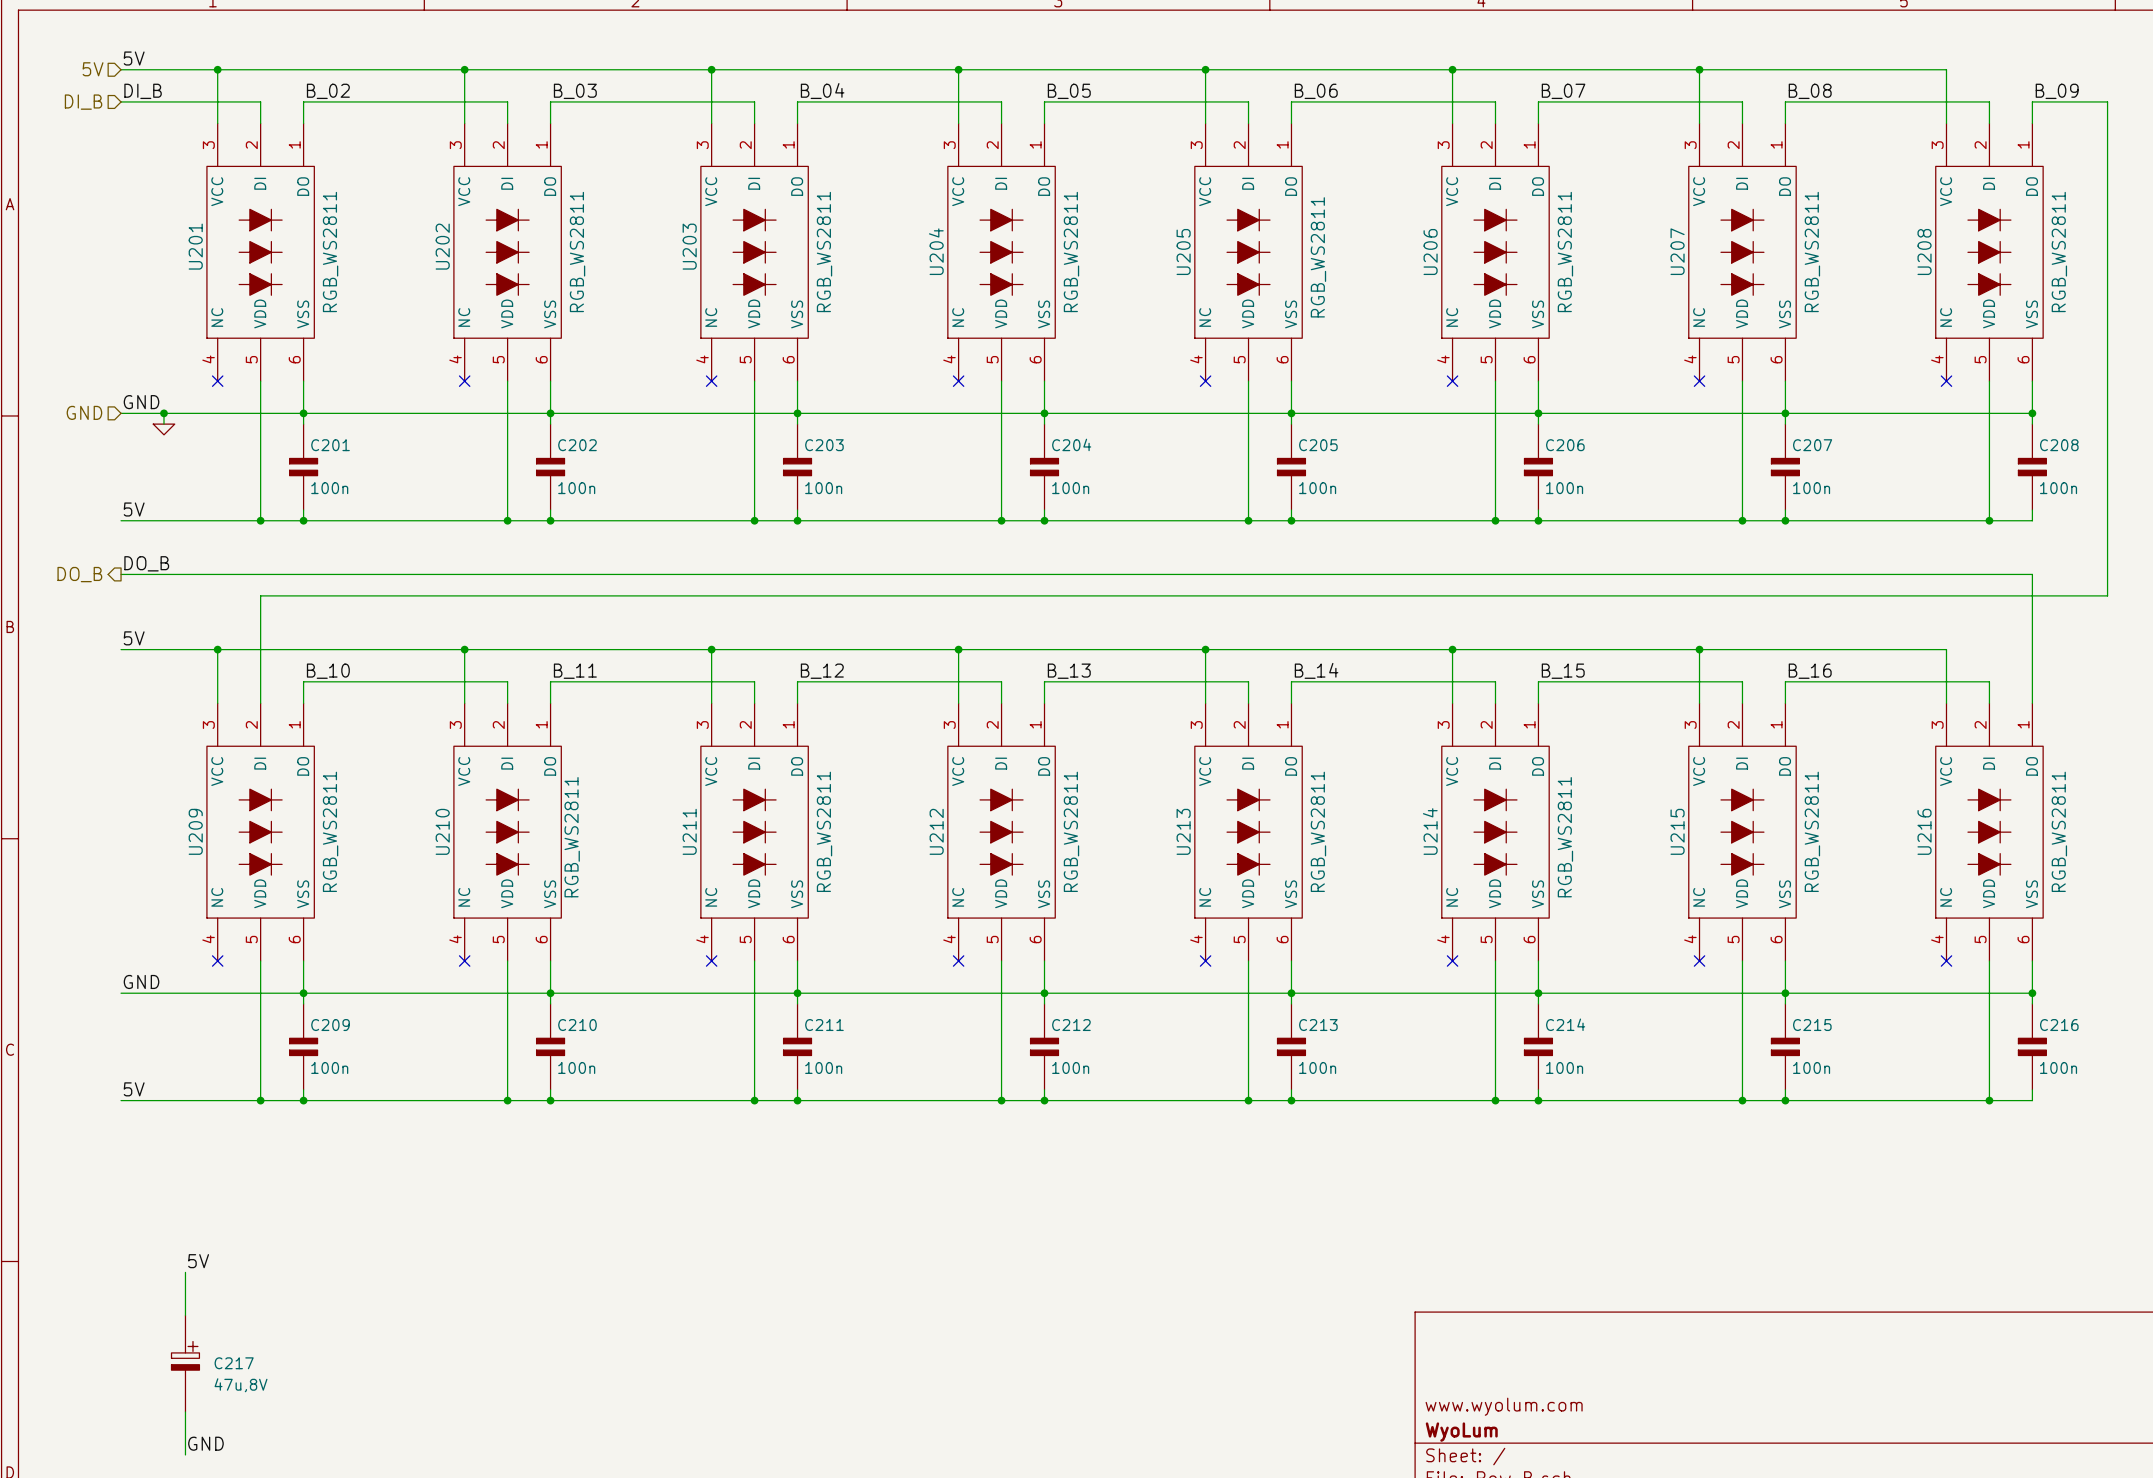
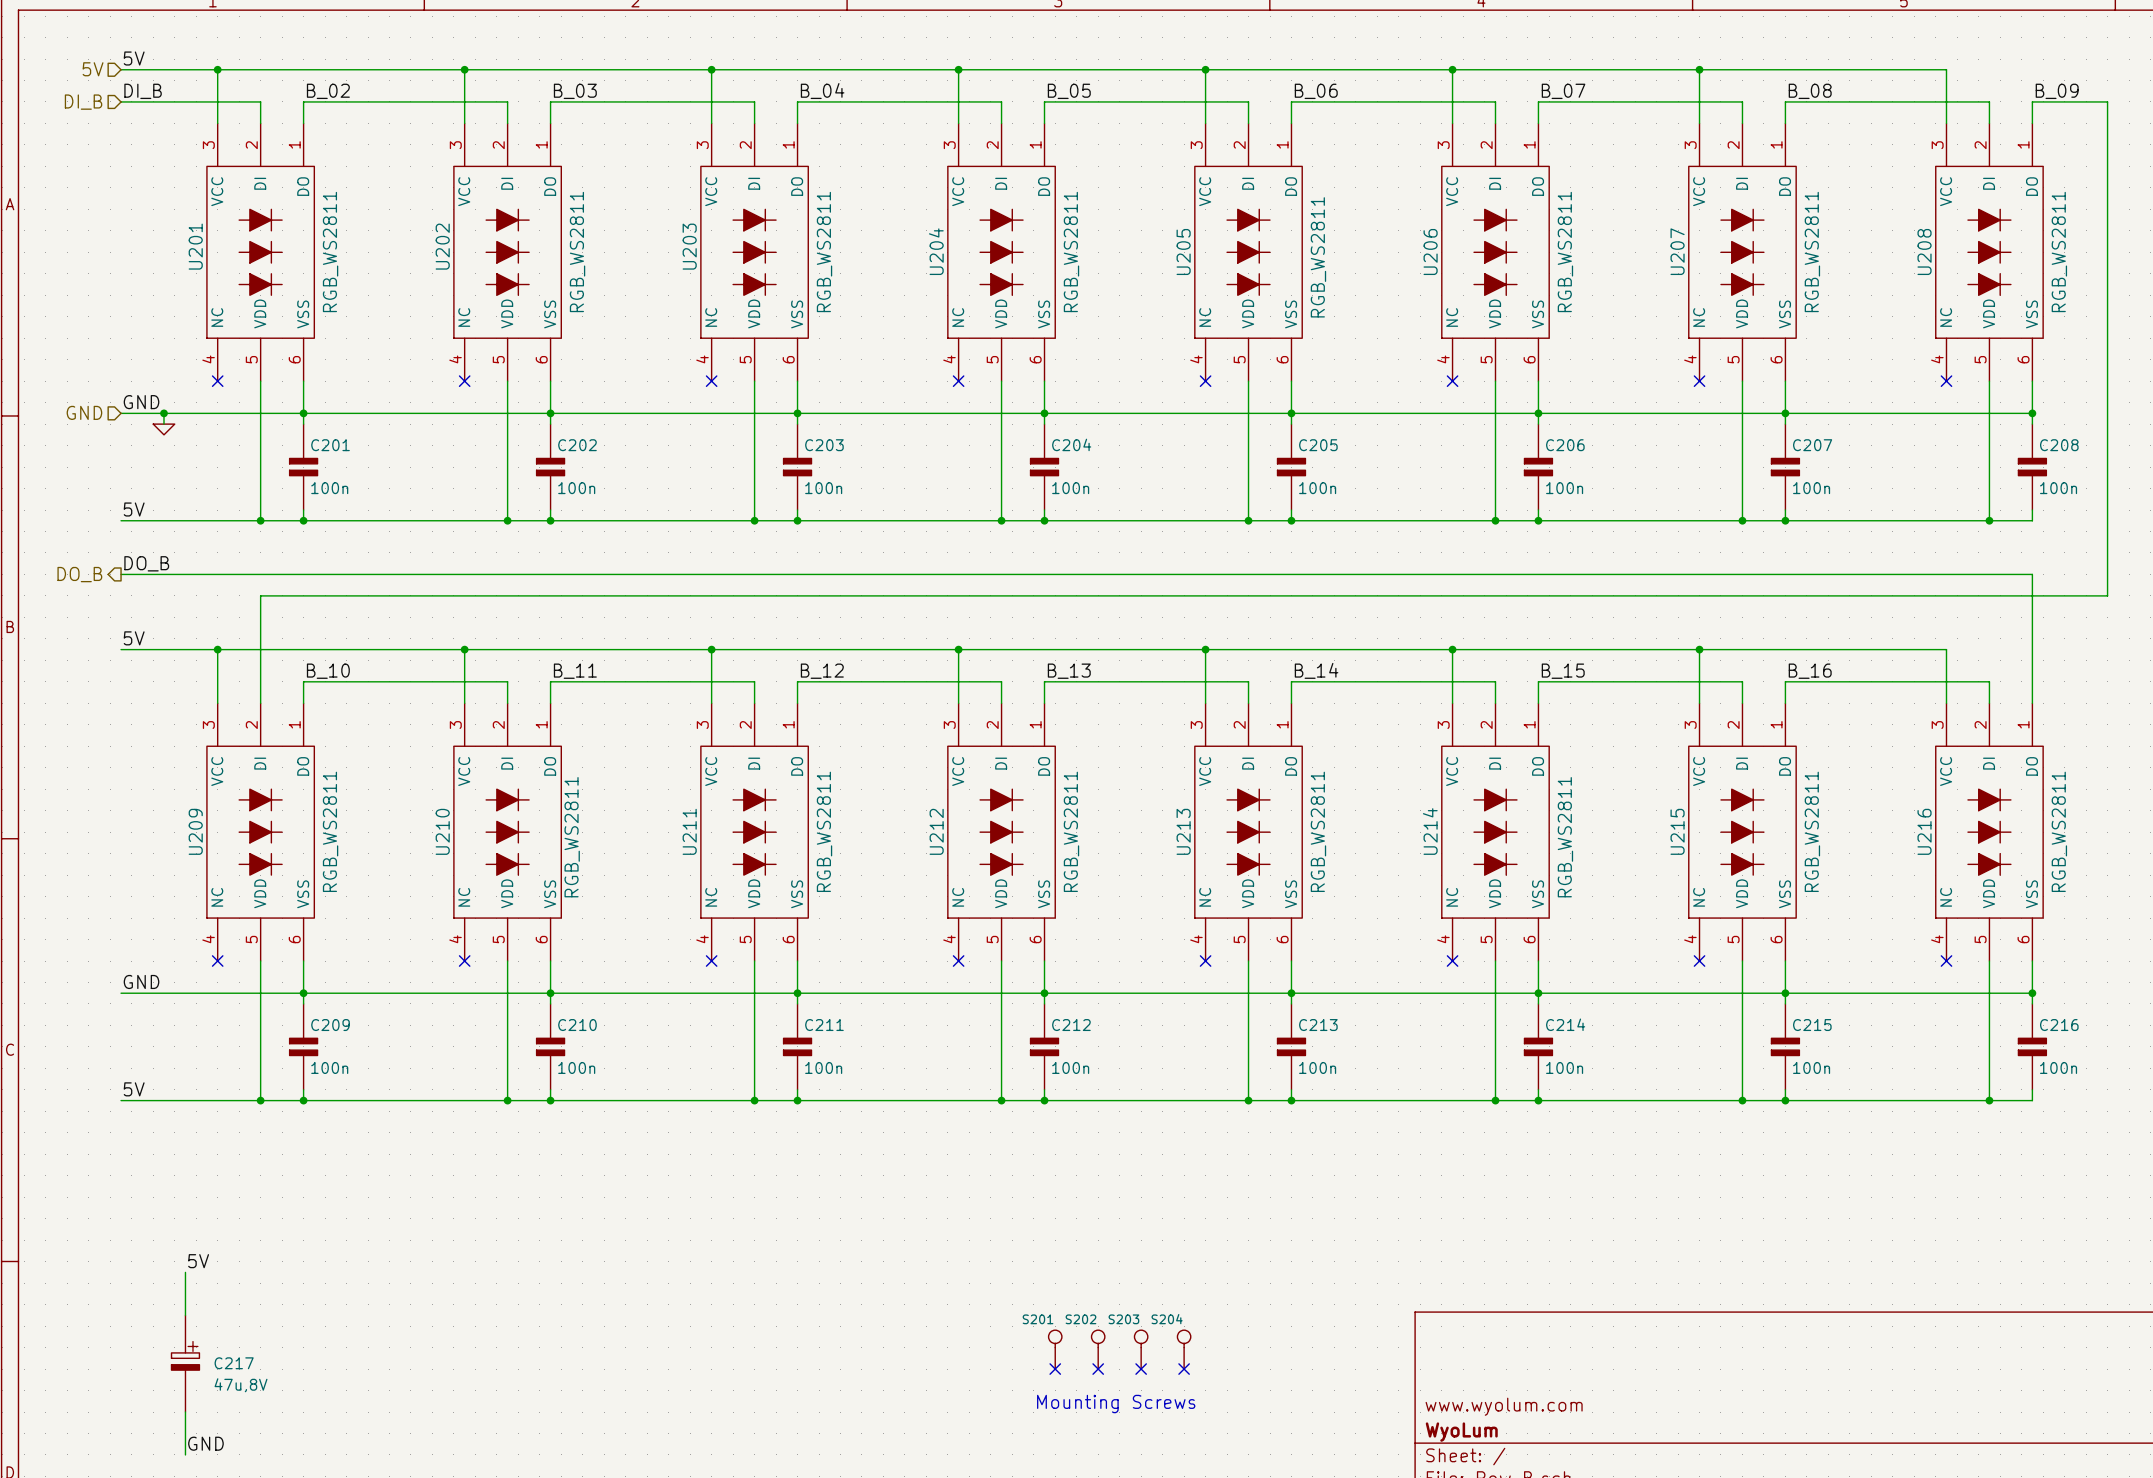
S201: none -> (1055, 1349)
S202: none -> (1098, 1349)
S203: none -> (1141, 1349)
S204: none -> (1184, 1349)
no-connect mark: none -> (1055, 1369)
no-connect mark: none -> (1098, 1369)
no-connect mark: none -> (1141, 1369)
no-connect mark: none -> (1184, 1369)
text: none -> Mounting Screws (1116, 1404)

